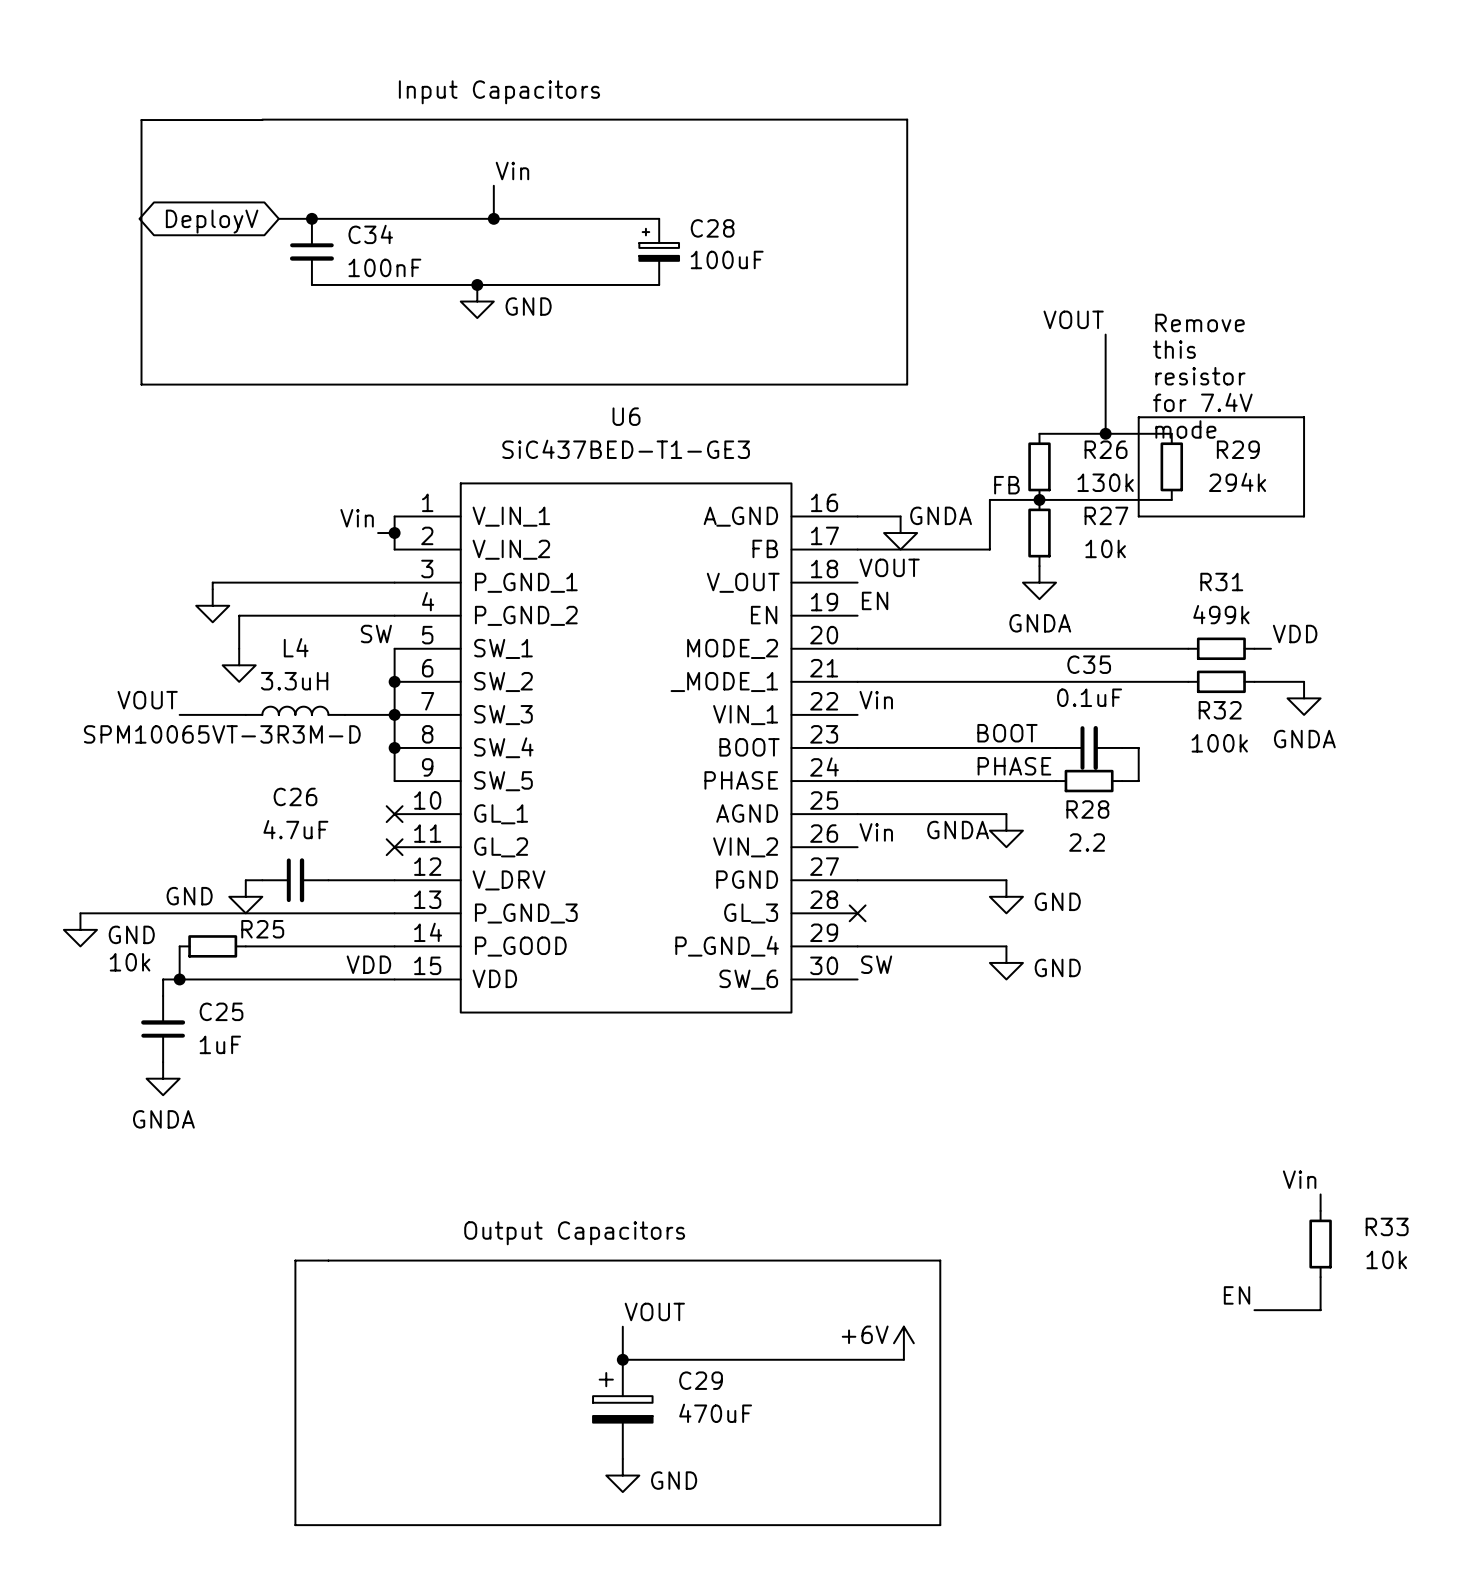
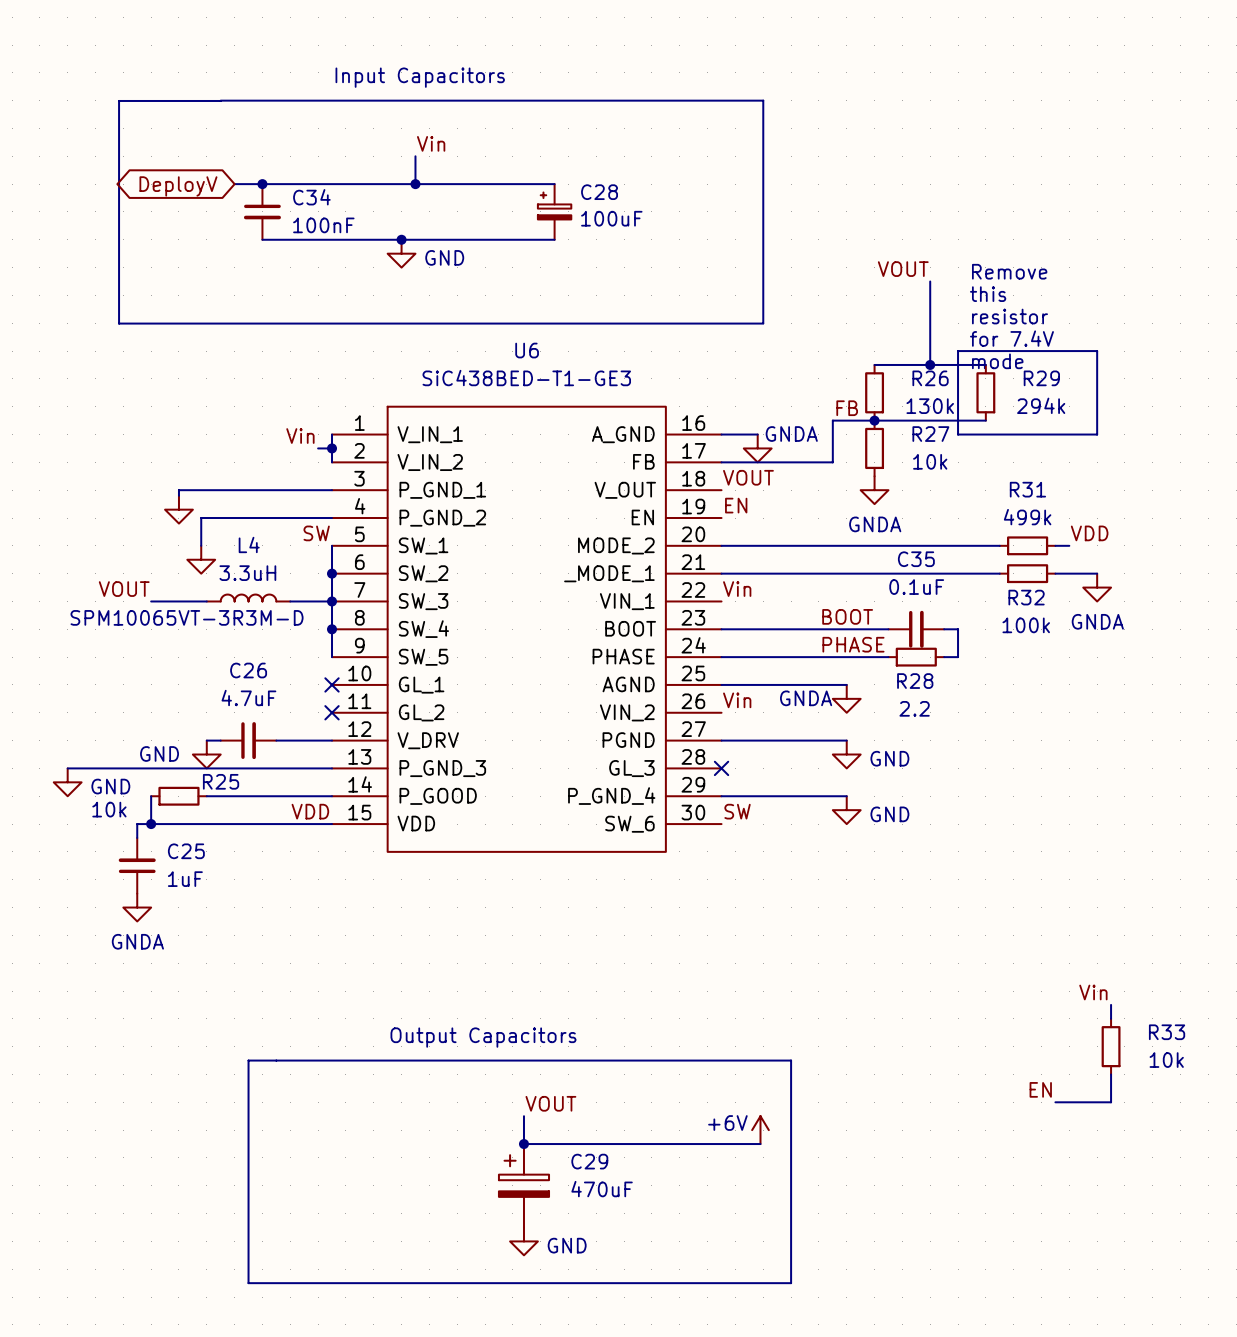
U6 value: SiC437BED-T1-GE3 (626, 449) -> SiC438BED-T1-GE3 (526, 378)

